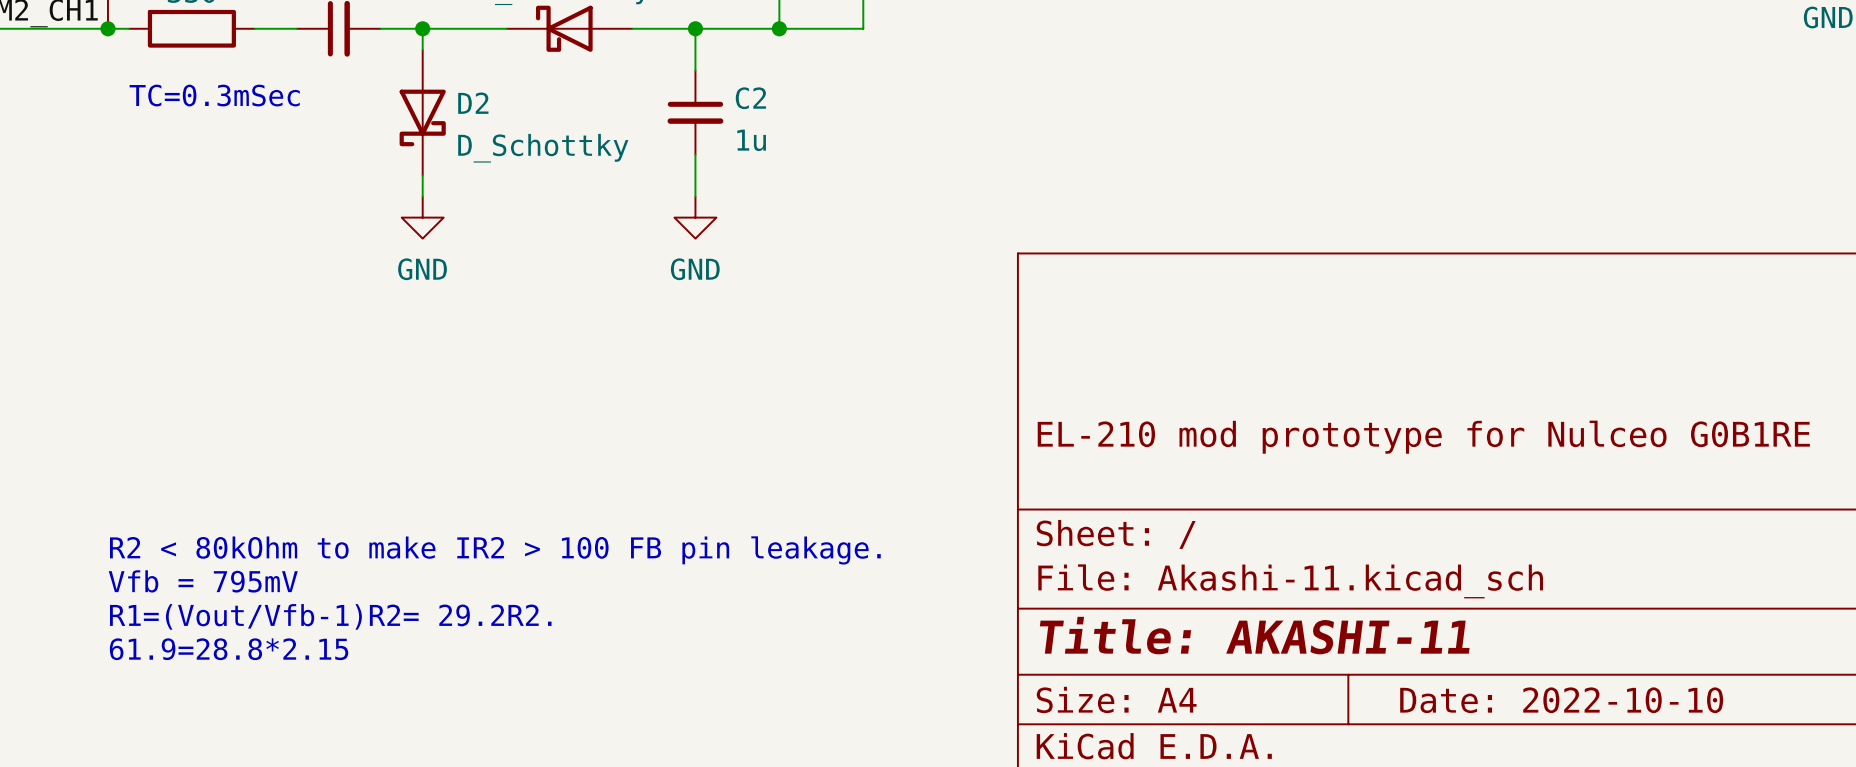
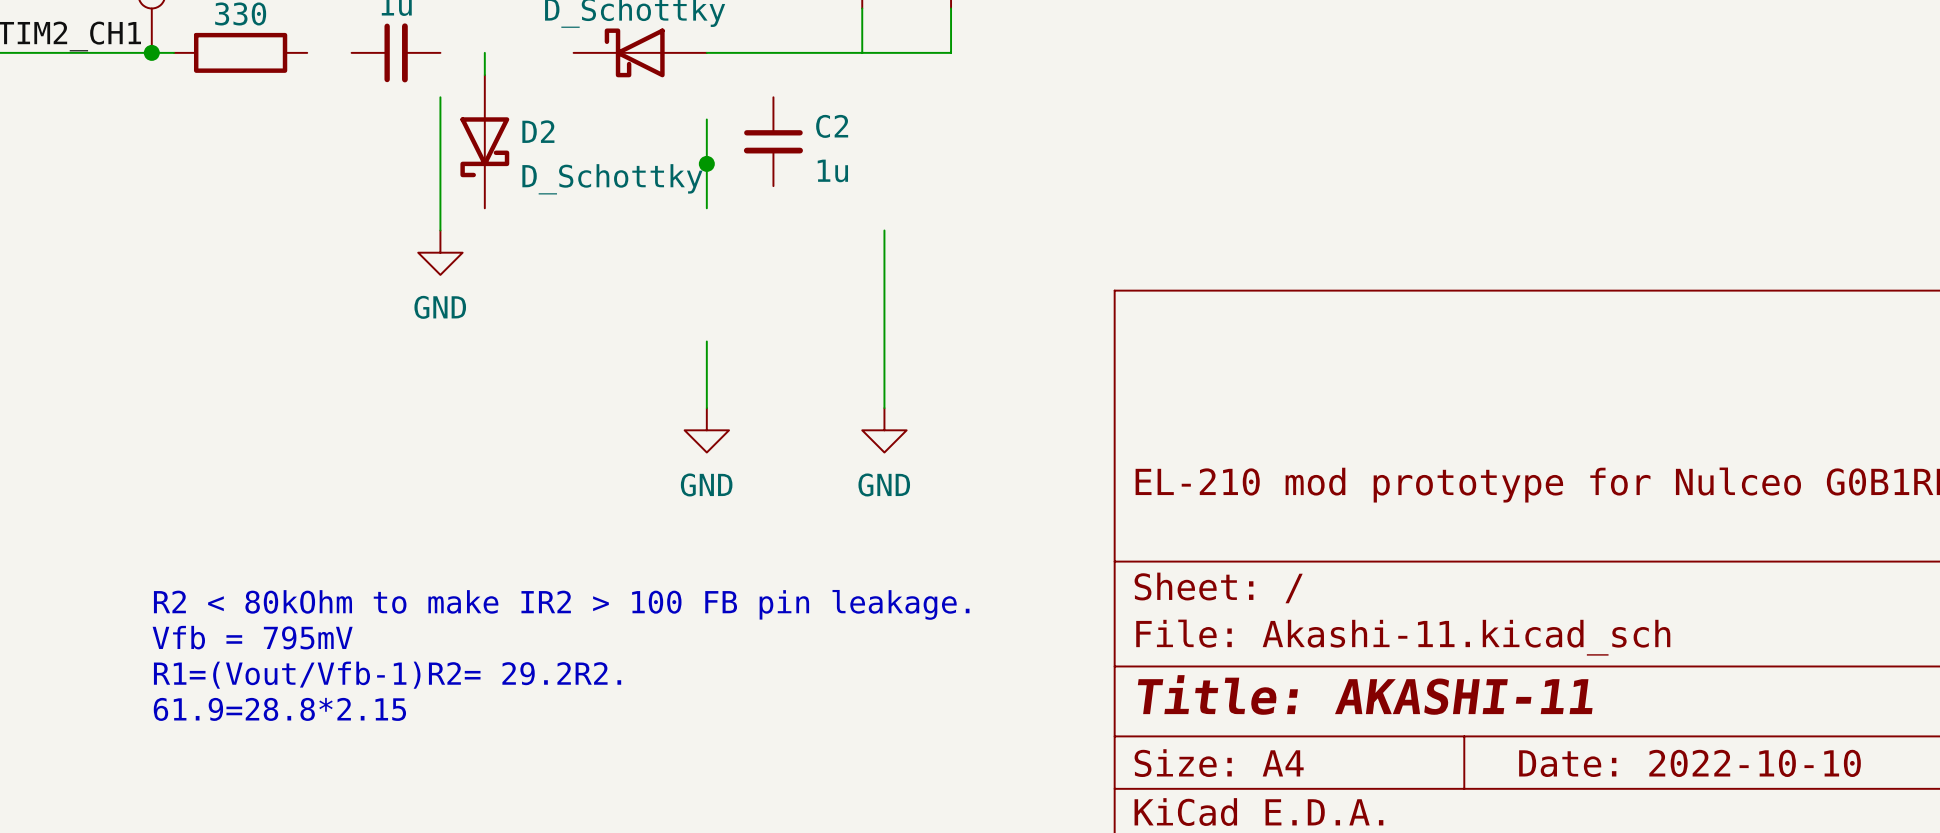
wire: (254, 28) (296, 28) -> none
wire: (380, 28) (506, 28) -> none
junction: (422, 28) -> none
wire: (695, 28) (695, 70) -> none
junction: (695, 28) -> none
junction: (779, 28) -> none
wire: none -> (440, 97) (440, 230)
wire: none -> (706, 119) (706, 208)
text: TC=0.3mSec (214, 95) -> none
junction: none -> (706, 163)
wire: (695, 154) (695, 196) -> none
wire: (422, 175) (422, 196) -> none
wire: none -> (884, 230) (884, 408)
power symbol position: GND (422, 217) -> GND (440, 252)
power symbol: GND (695, 217) -> none
wire: none -> (706, 341) (706, 408)
power symbol: none -> GND (706, 430)
power symbol: none -> GND (884, 430)

